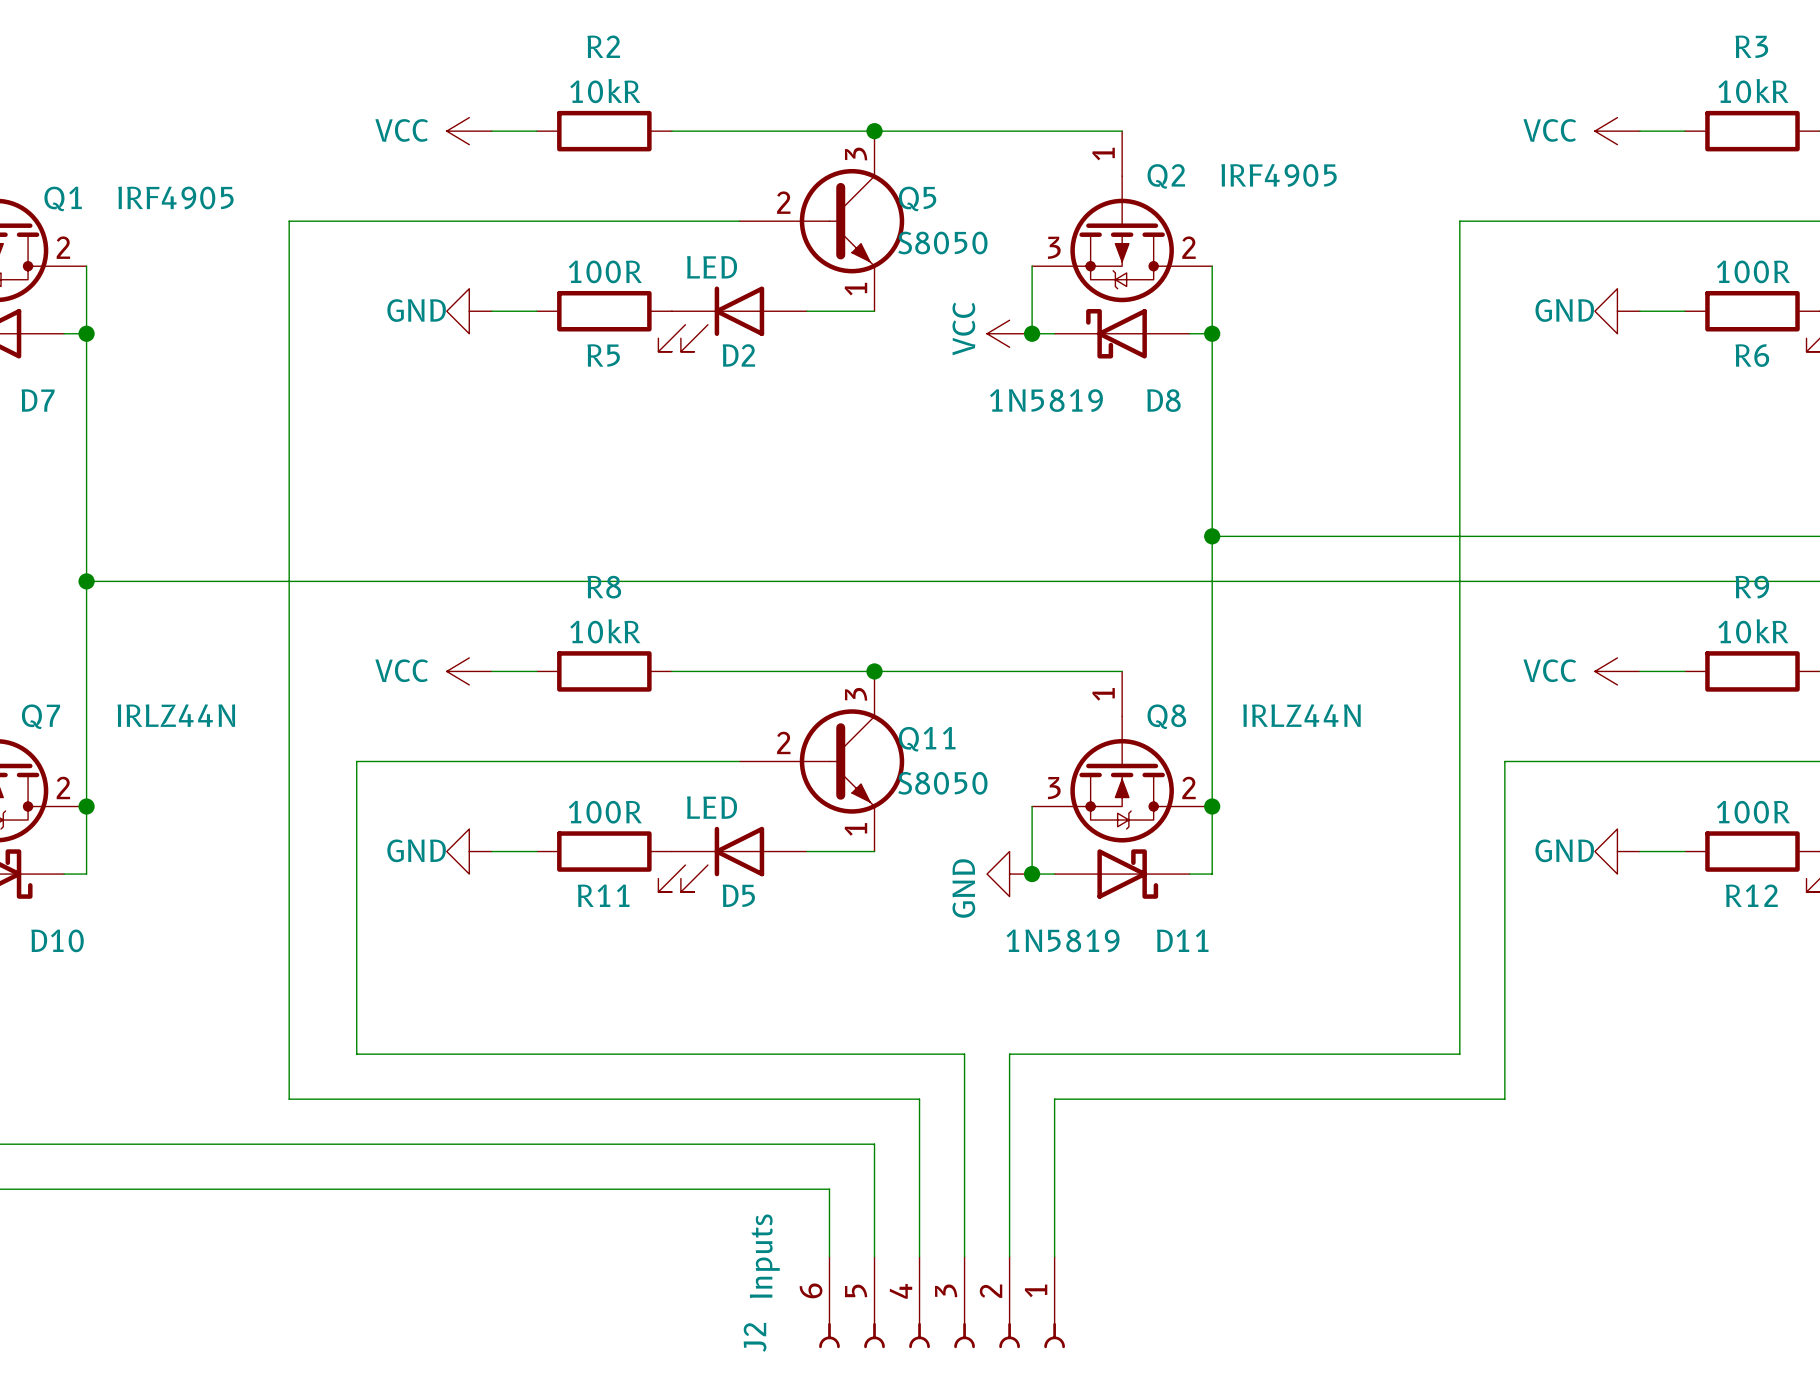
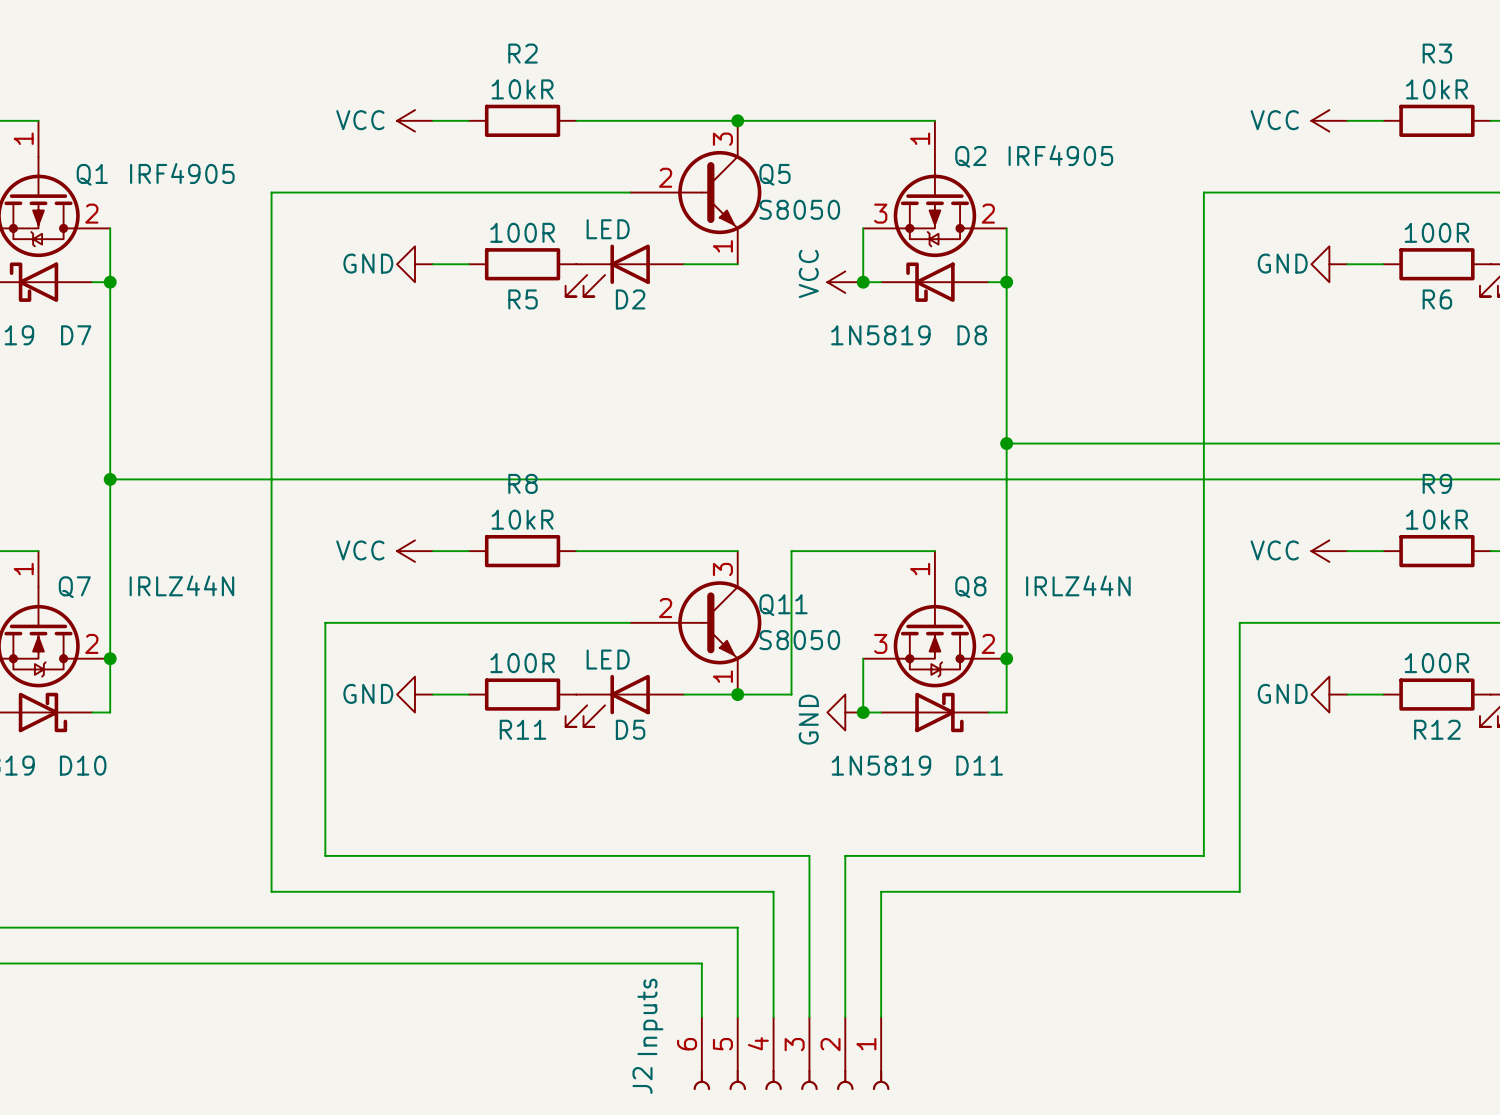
wire: (874, 671) (942, 671) -> (737, 694) (791, 694) (791, 551)
junction: (874, 671) -> none
junction: none -> (737, 694)

